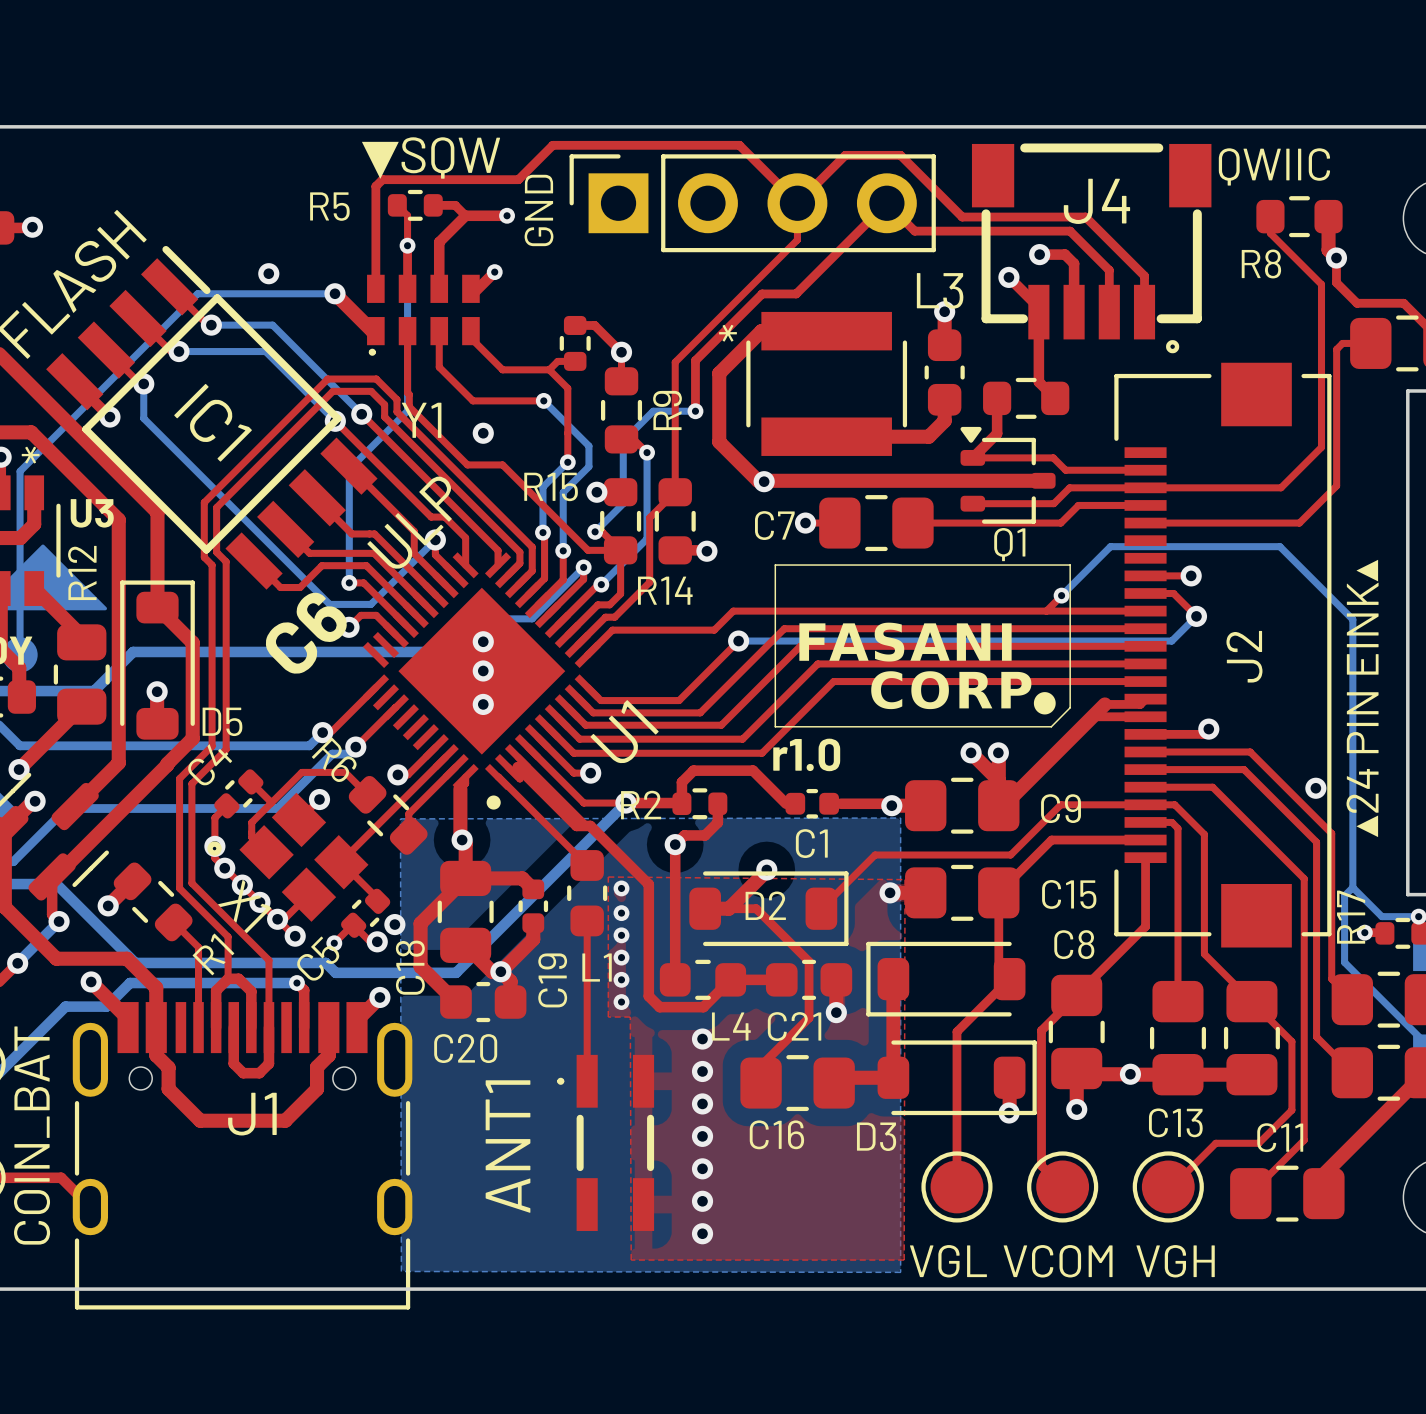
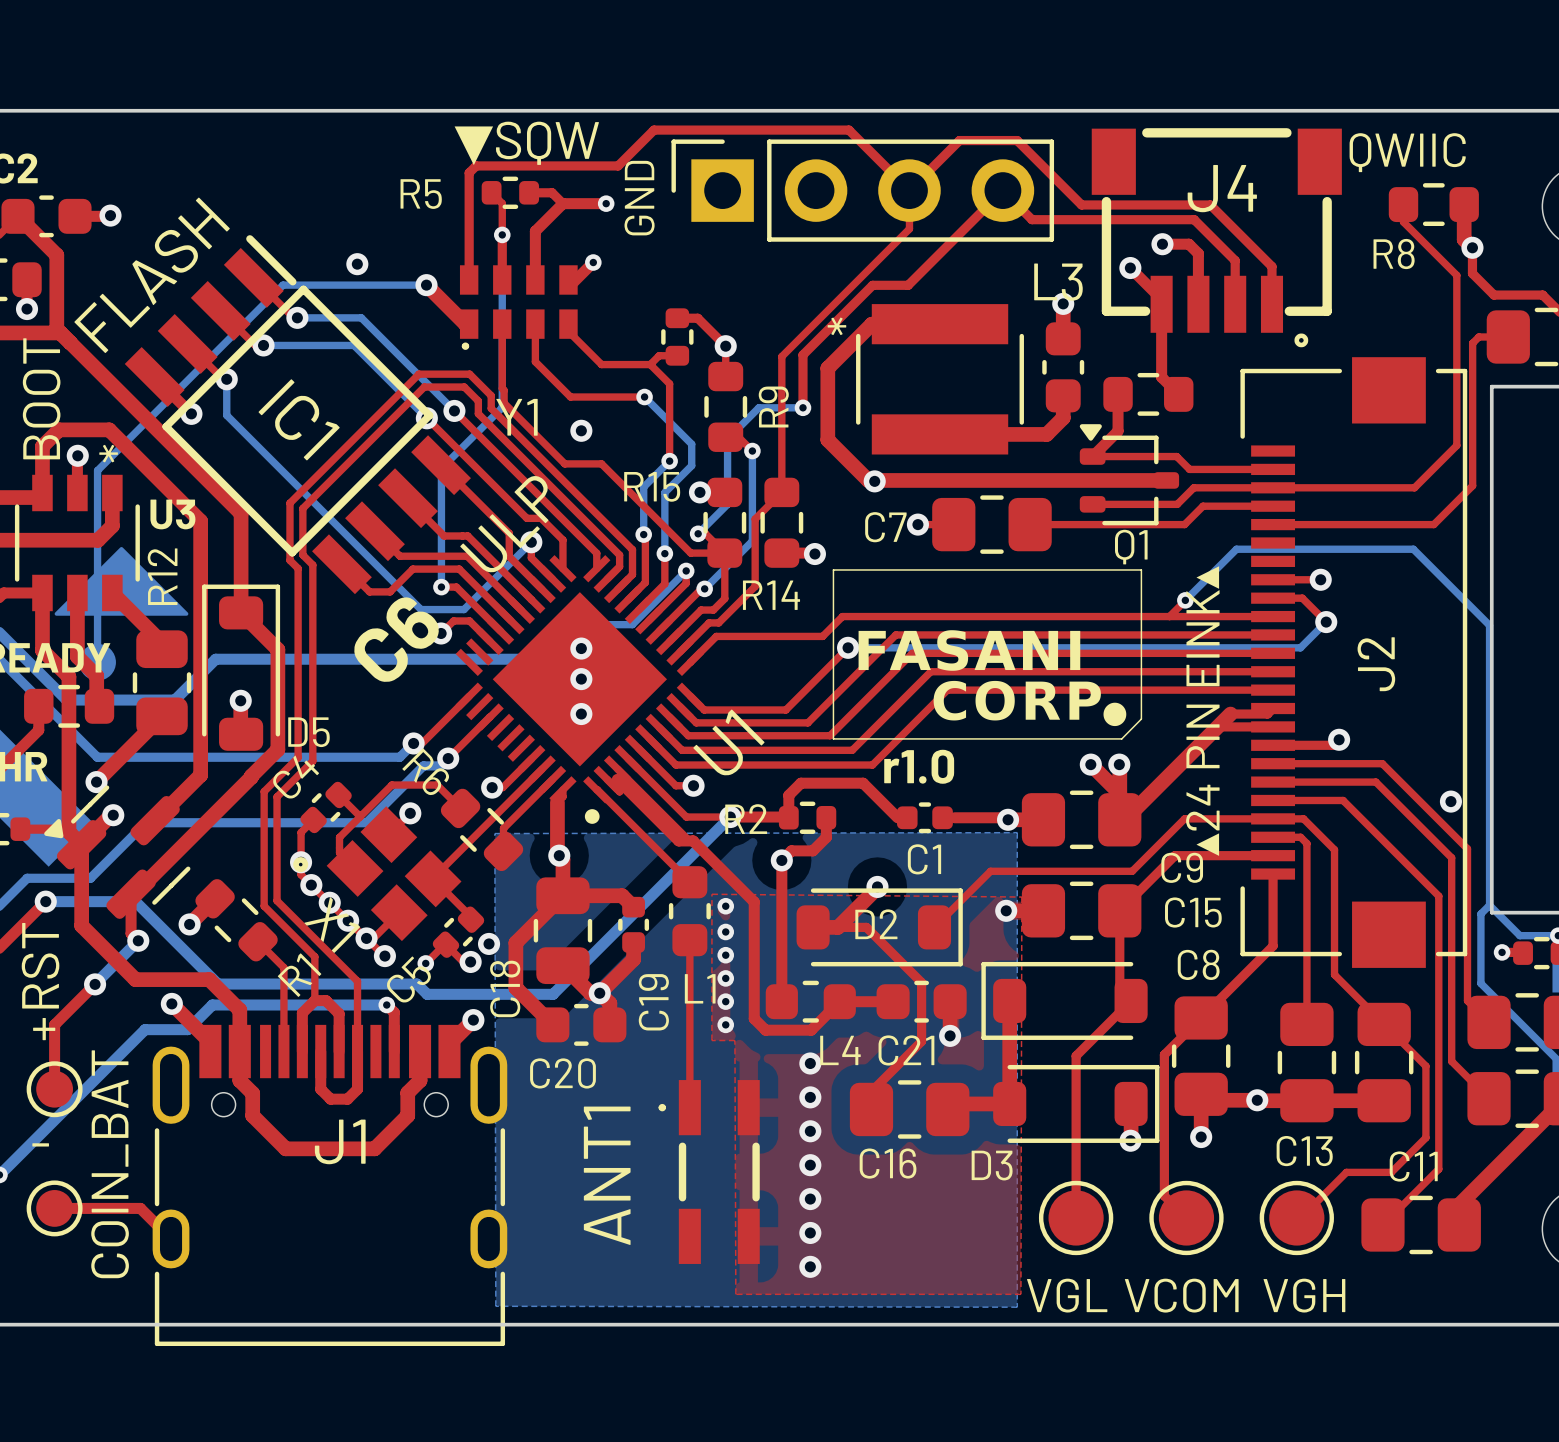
board edge: (1407, 390) (1407, 894) -> (1546, 386) (1491, 386) (1491, 912) (1546, 912)
line: (775, 565) (1070, 565) (1070, 707) (1051, 726) (775, 726) (775, 565) -> (833, 569) (1141, 569) (1141, 719) (1121, 738) (833, 738) (833, 569)
drawing shape: [829, 623, 869, 661] -> [974, 630, 1016, 671]
drawing: [910, 623, 950, 661] -> none
drawing: none -> [889, 630, 931, 671]
drawing position: (812, 642) -> (872, 650)
drawing position: (889, 642) -> (952, 650)
drawing position: (973, 642) -> (1040, 650)
drawing position: (1006, 642) -> (1075, 650)
drawing position: (886, 690) -> (949, 700)
drawing position: (930, 690) -> (995, 700)
drawing position: (975, 690) -> (1042, 700)
drawing position: (1016, 690) -> (1085, 700)
text position: ▴24 PIN EINK▴ (1362, 698) -> ▴24 PIN EINK▴ (1202, 711)
drawing position: (1044, 703) -> (1114, 714)
C9 name position: C9 (1061, 808) -> C9 (1182, 867)
R17 name: R17 (1351, 917) -> none

